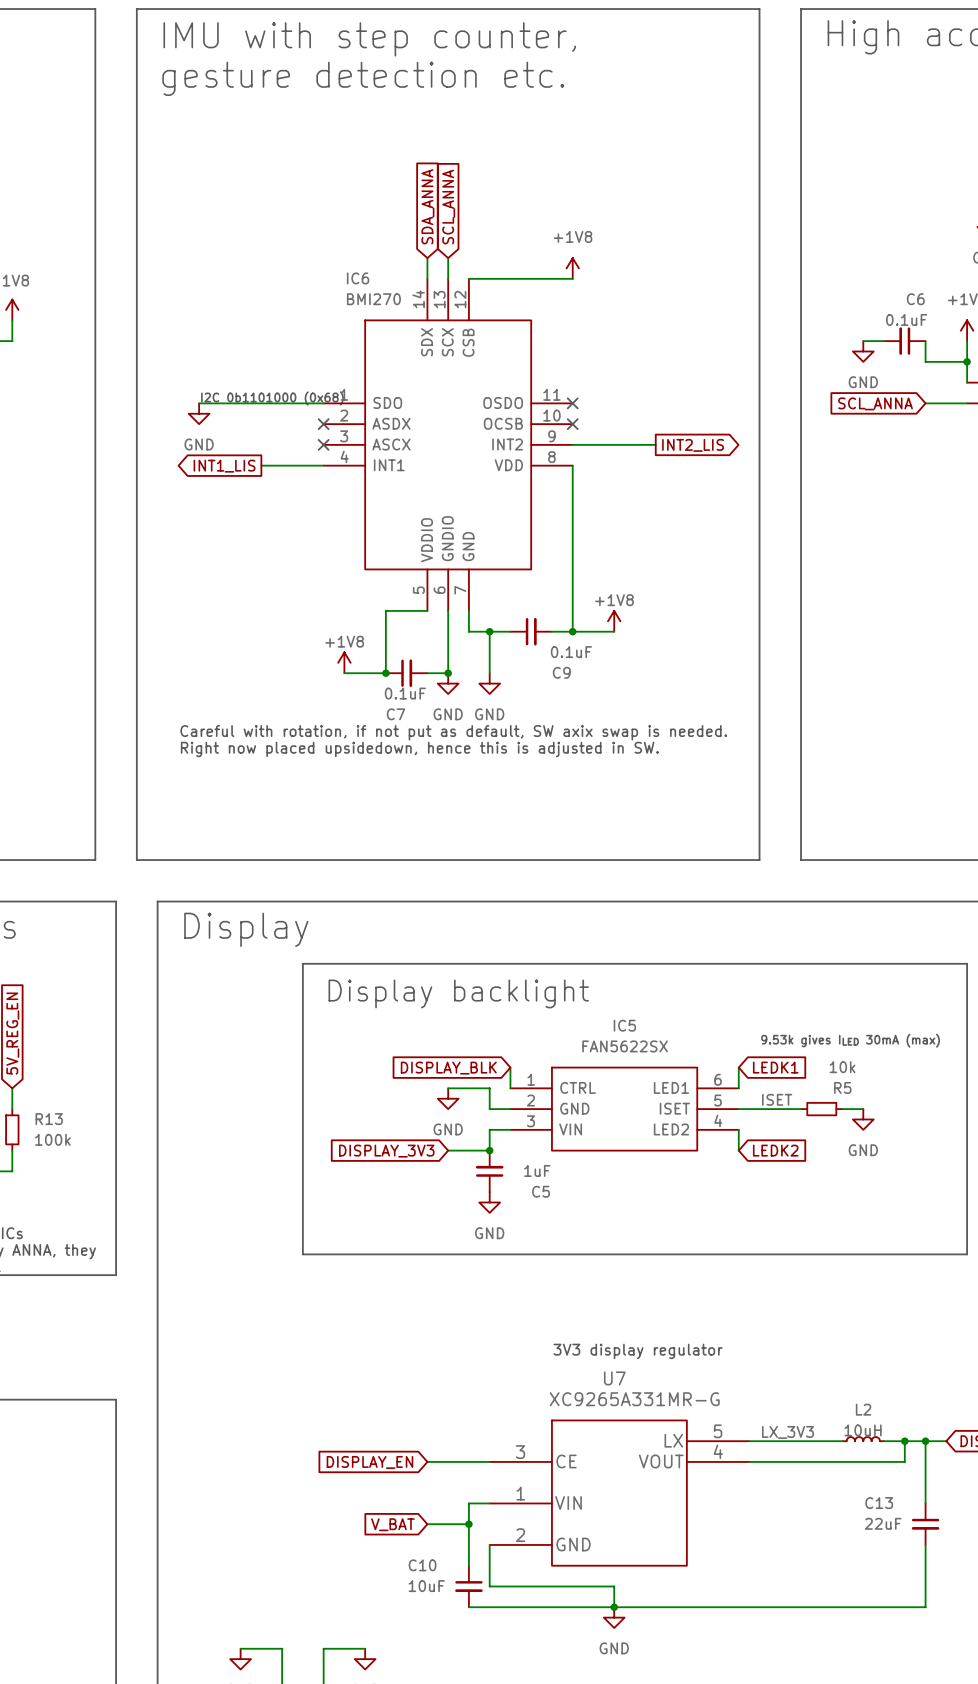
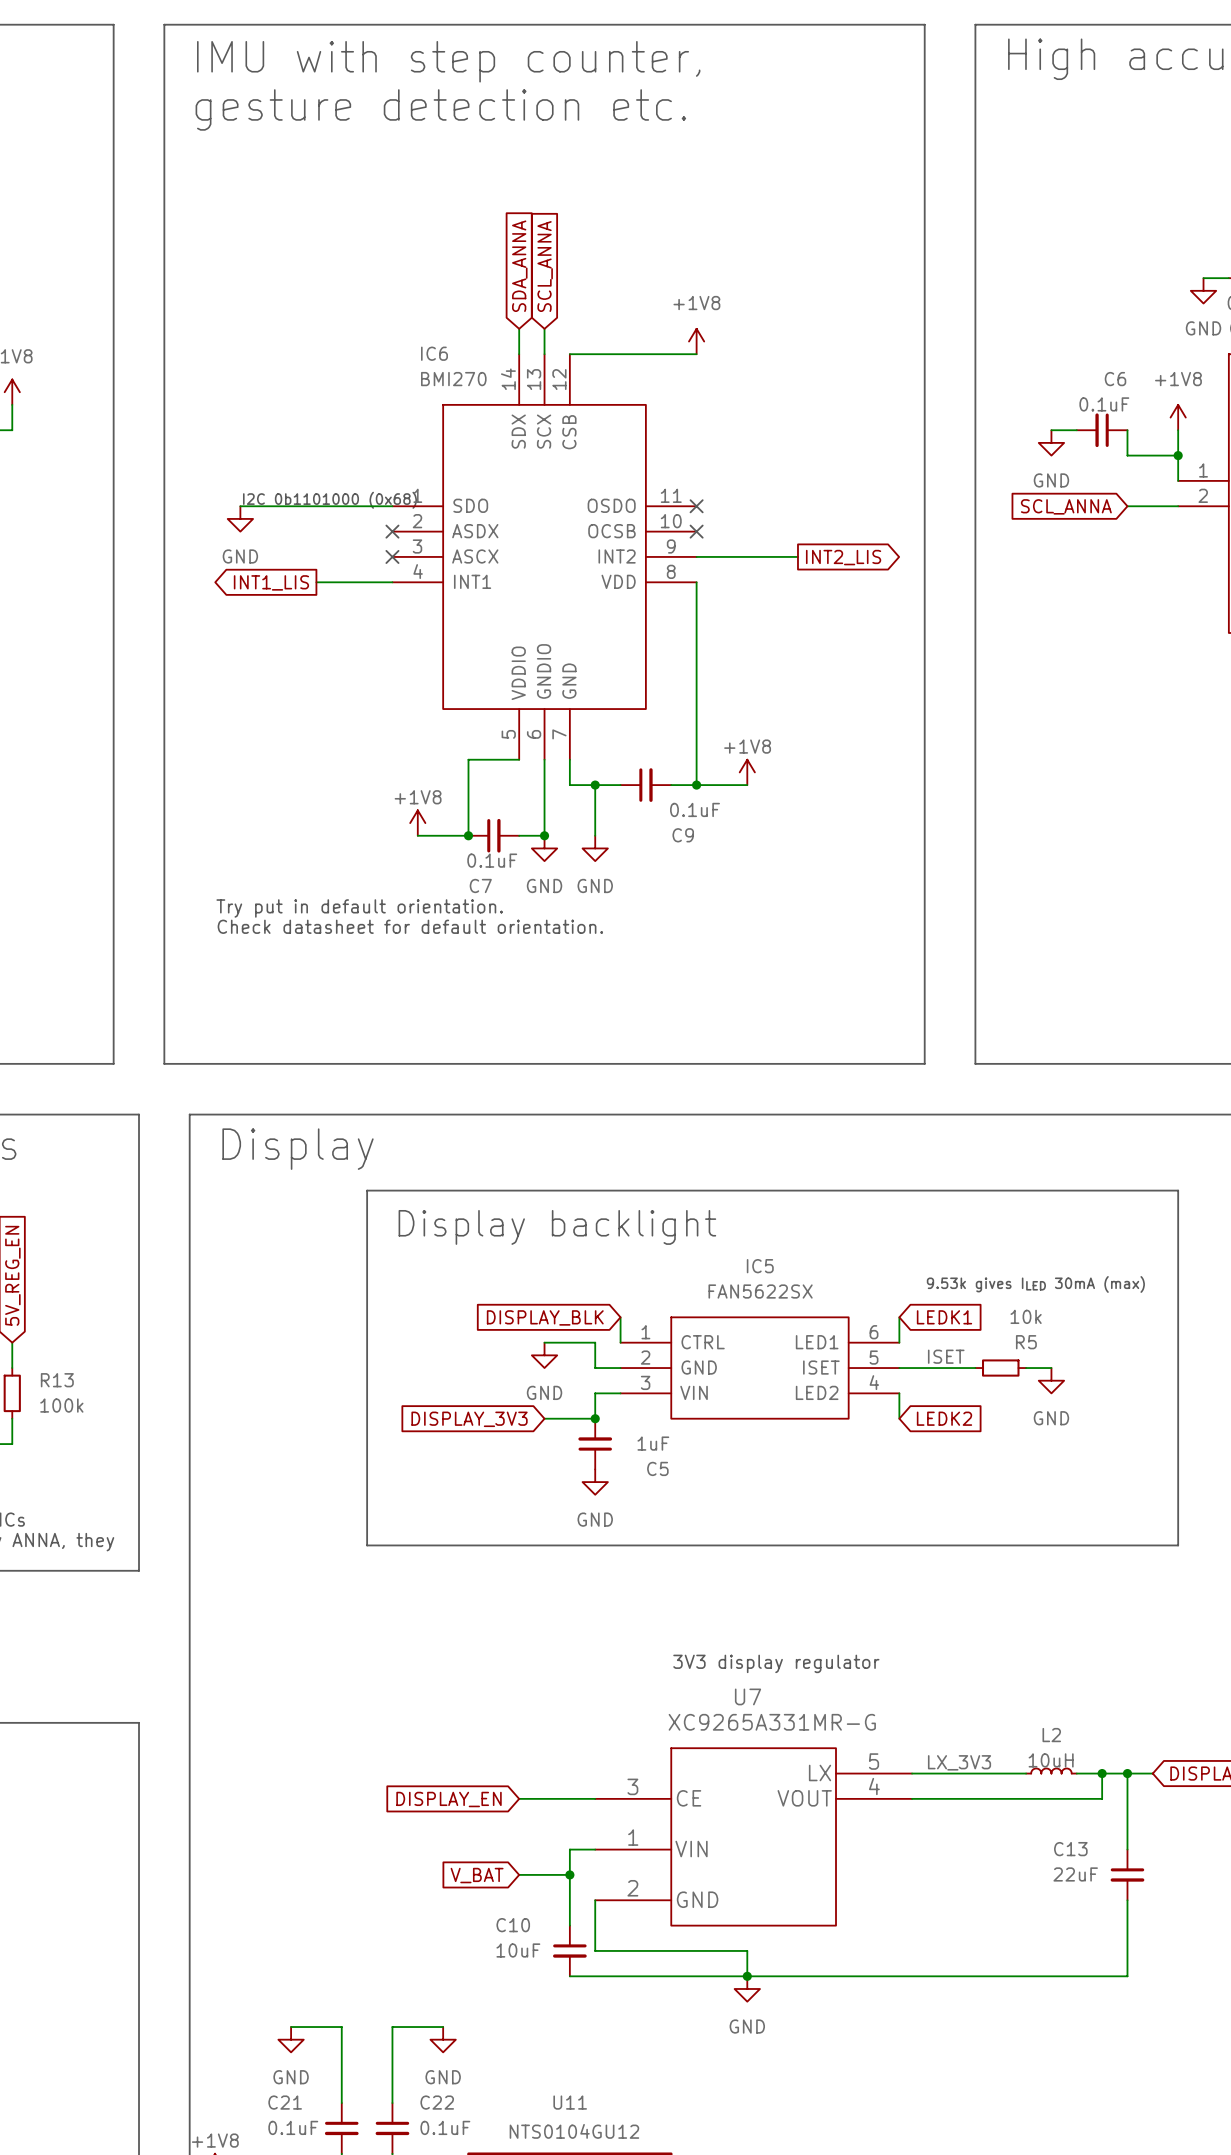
text: Careful with rotation, if not put as default, SW axix swap is needed. (453, 732) -> Try put in default orientation. (359, 908)
text: Right now placed upsidedown, hence this is adjusted in SW. (419, 749) -> Check datasheet for default orientation. (410, 926)

